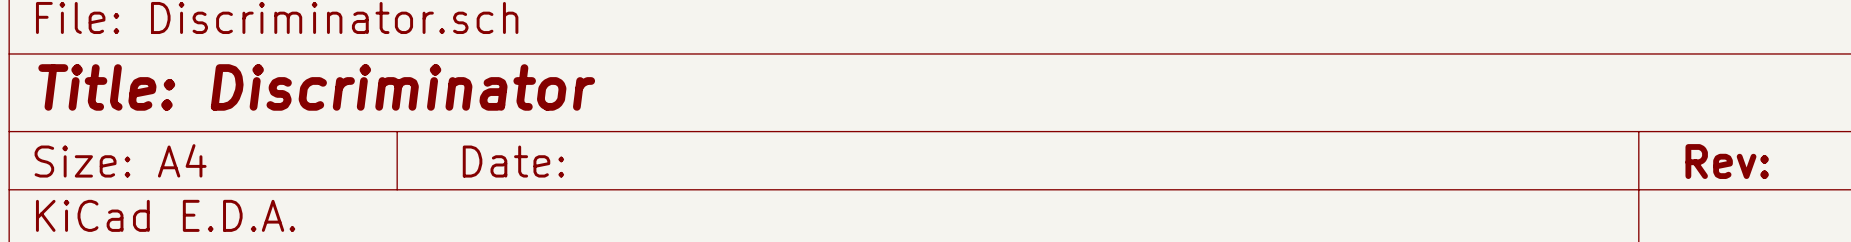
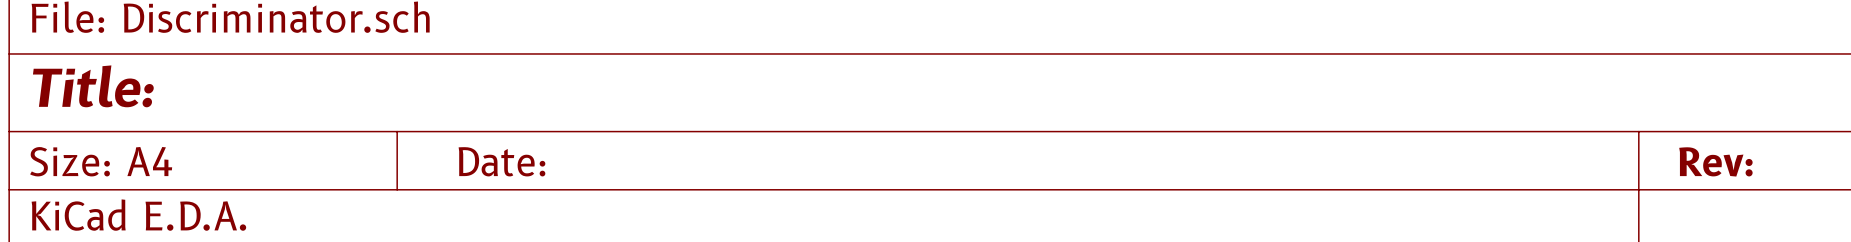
title block: Title: Discriminator (316, 87) -> Title: (93, 86)

